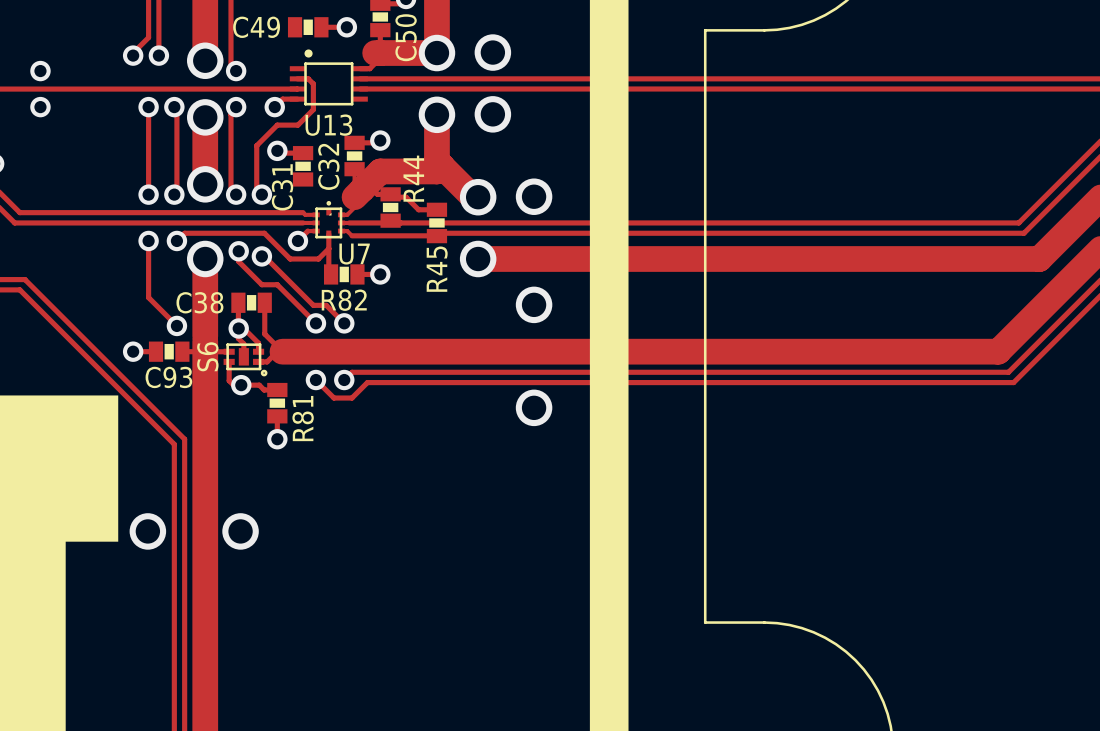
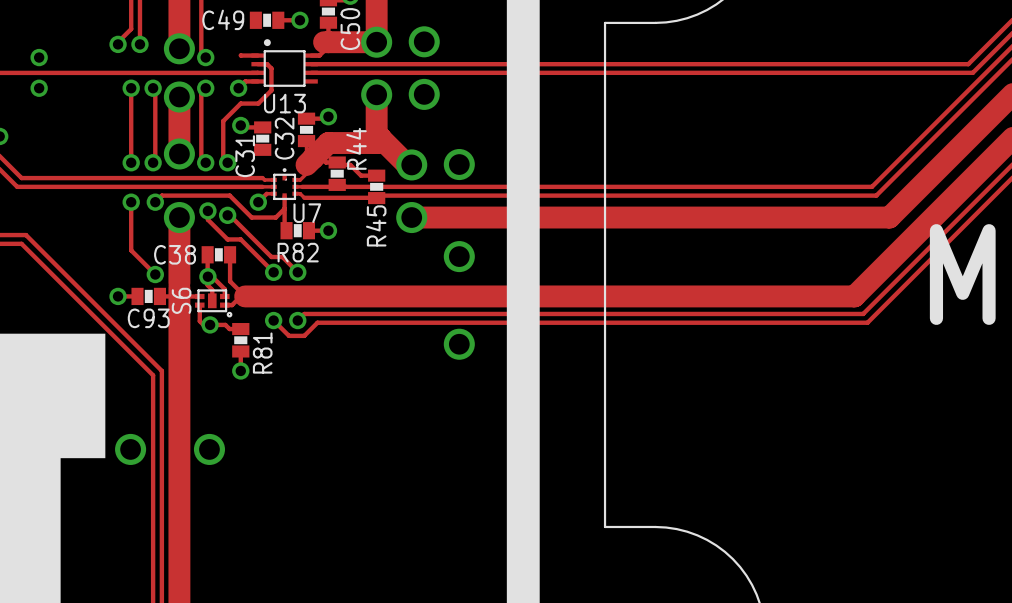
track: none -> (240, 55) (257, 55)

